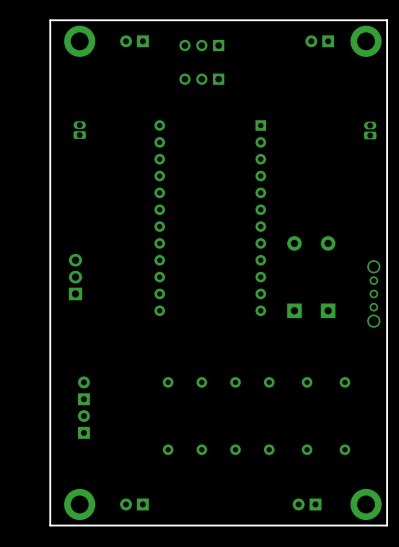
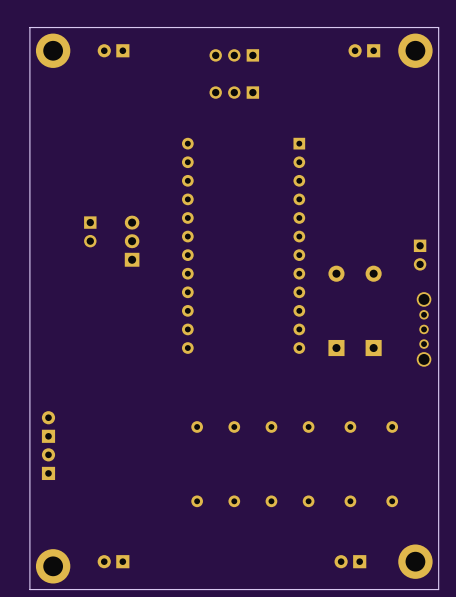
board edge: (50, 20) (50, 525) (387, 525) -> (67, 27) (29, 27) (29, 589) (438, 589) (438, 584)
part position: (79, 41) -> (53, 50)
part position: (134, 41) -> (113, 50)
part: (79, 130) -> none
part: (370, 130) -> none
part: none -> (90, 231)
part: none -> (420, 255)
part position: (75, 277) -> (132, 241)
part: none -> (48, 427)
part: (83, 390) -> none
part: none -> (48, 464)
part: (83, 424) -> none
part position: (79, 504) -> (53, 566)
part: none -> (113, 561)
part: (134, 504) -> none

